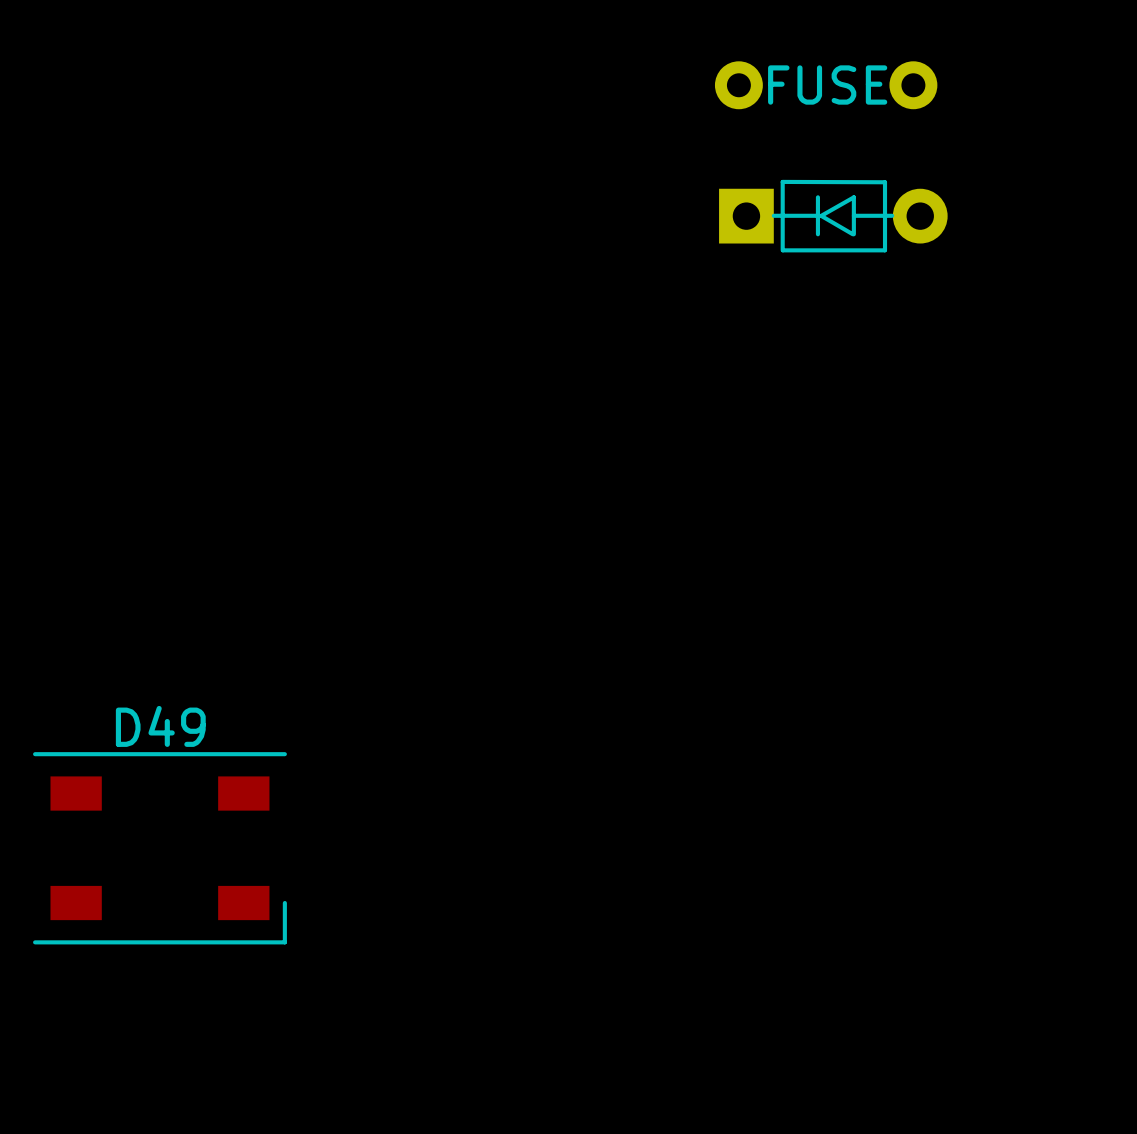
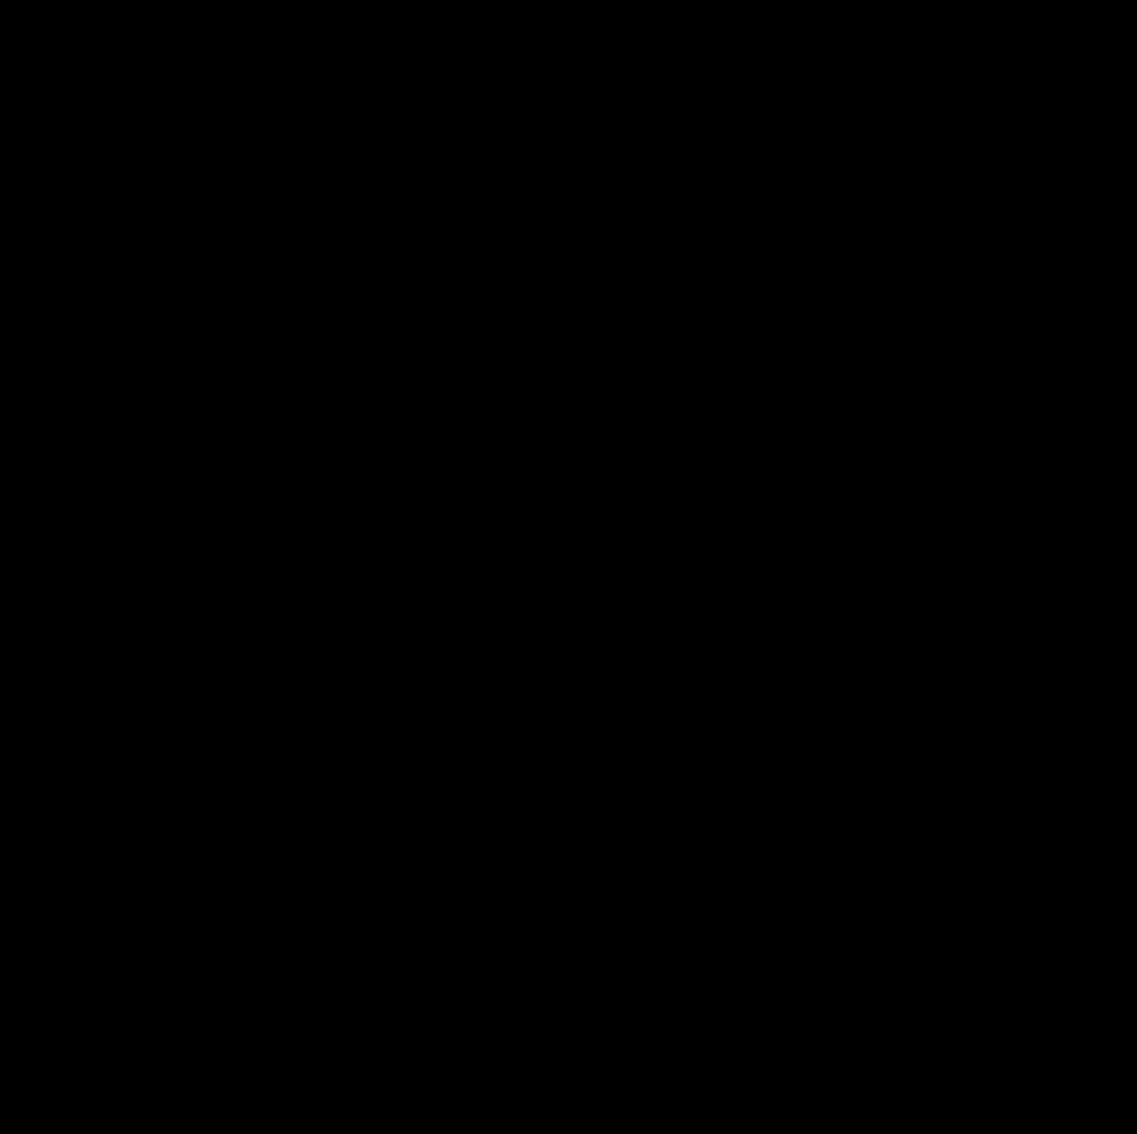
part: (826, 85) -> none
part: (833, 216) -> none
D49: (159, 848) -> none

